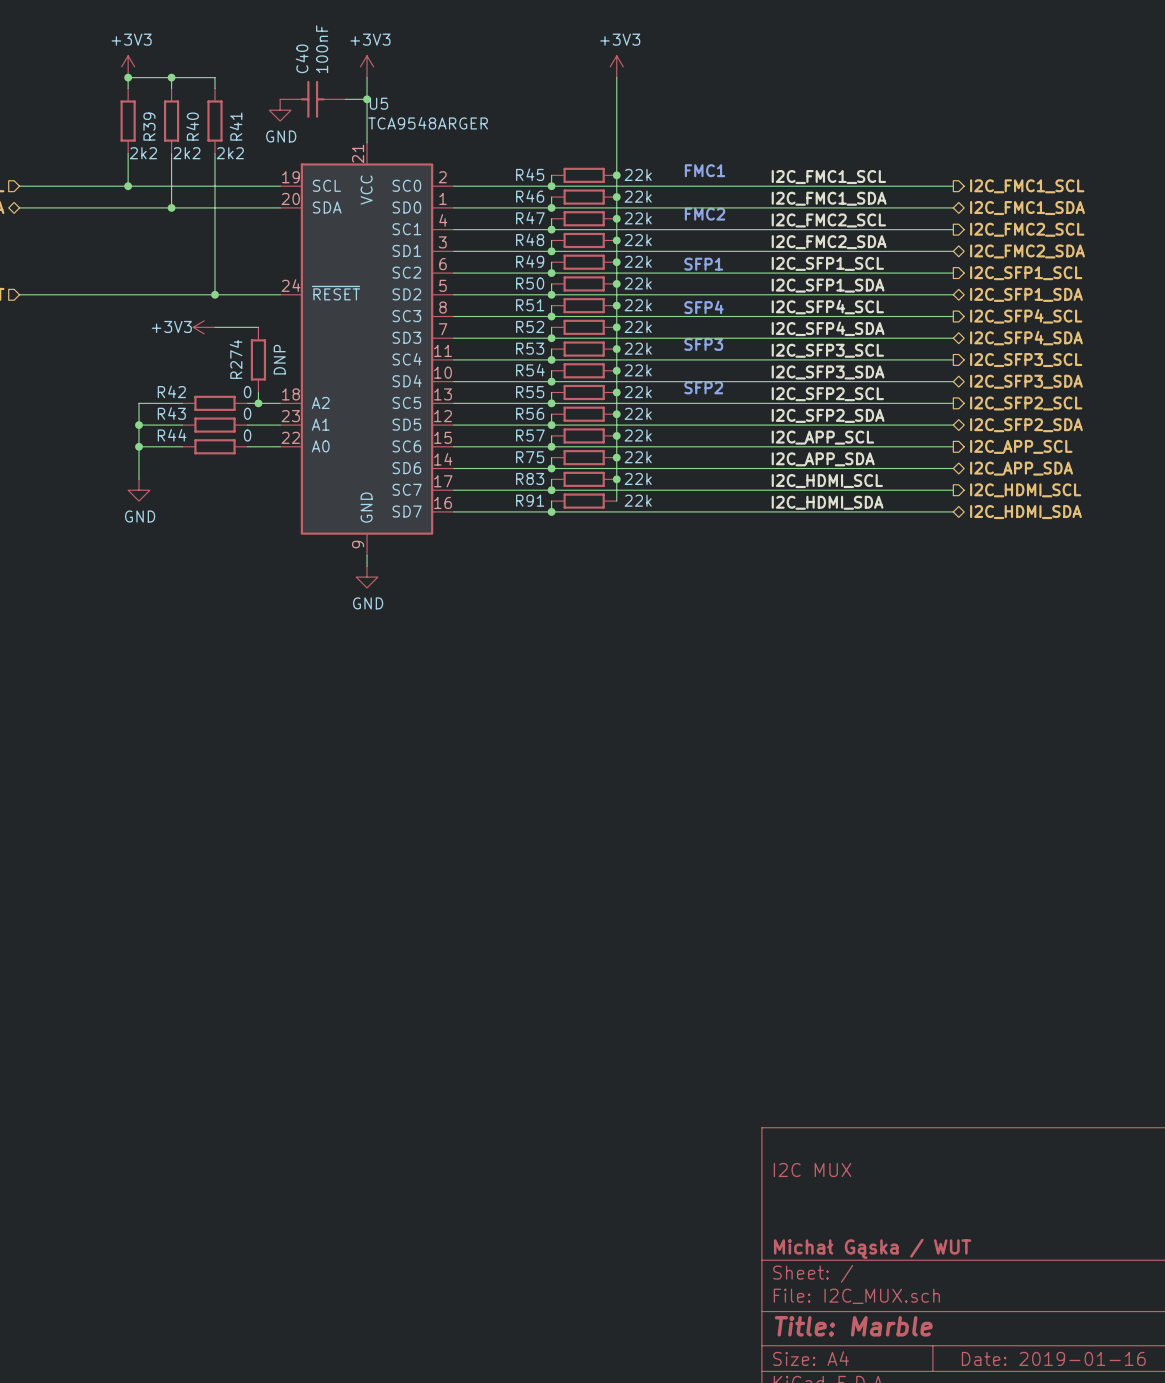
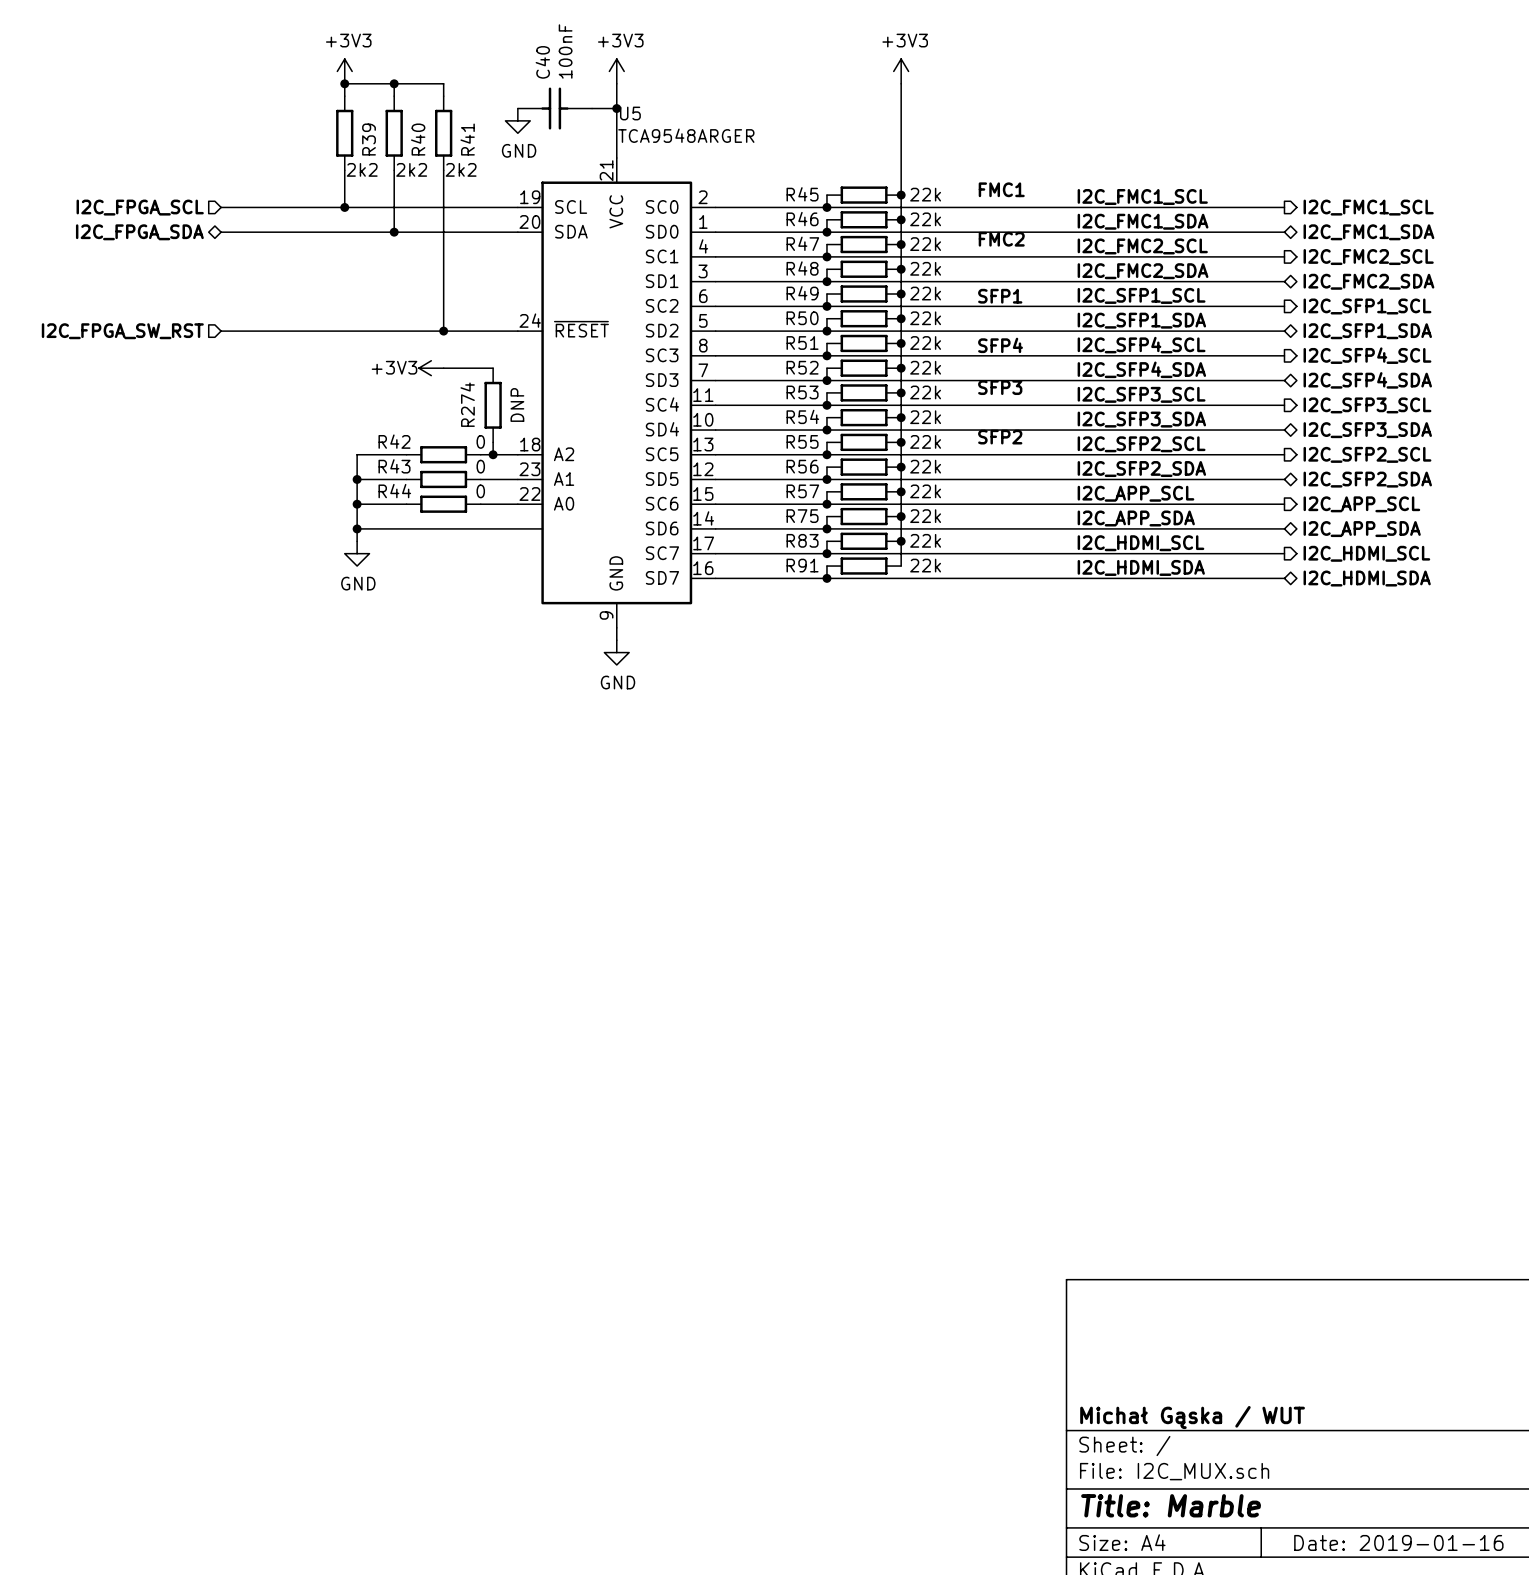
wire: none -> (357, 528) (542, 528)
junction: none -> (357, 528)
title block: I2C MUX (812, 1170) -> none

